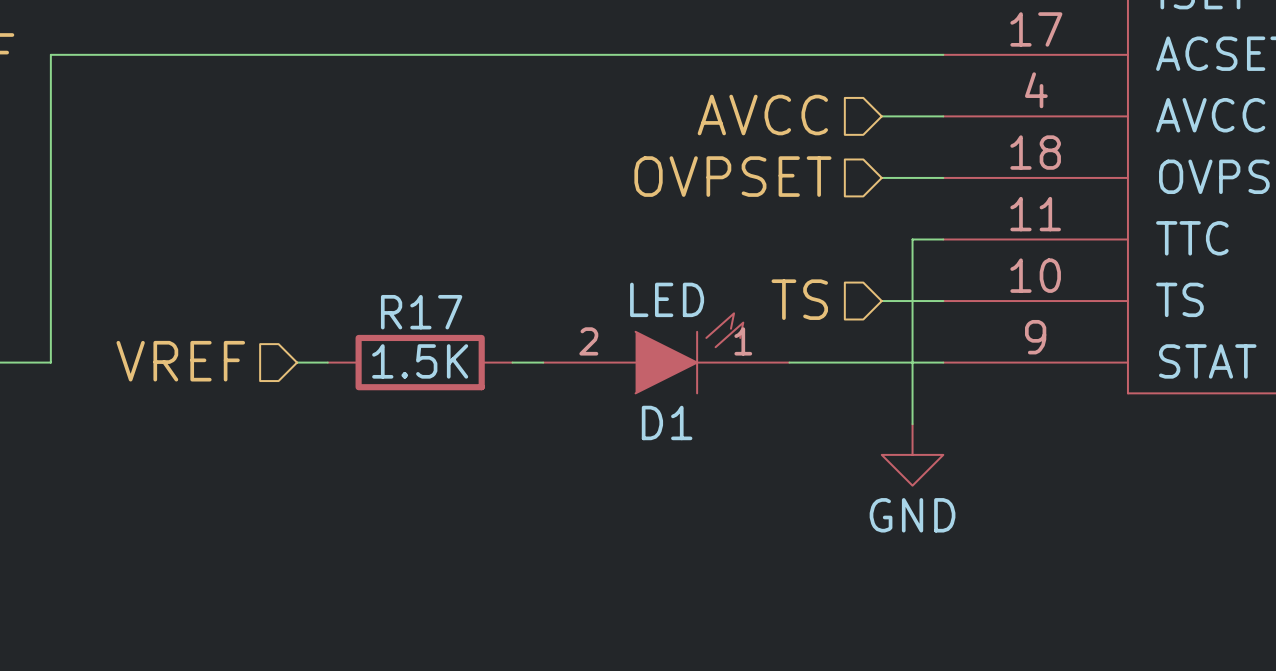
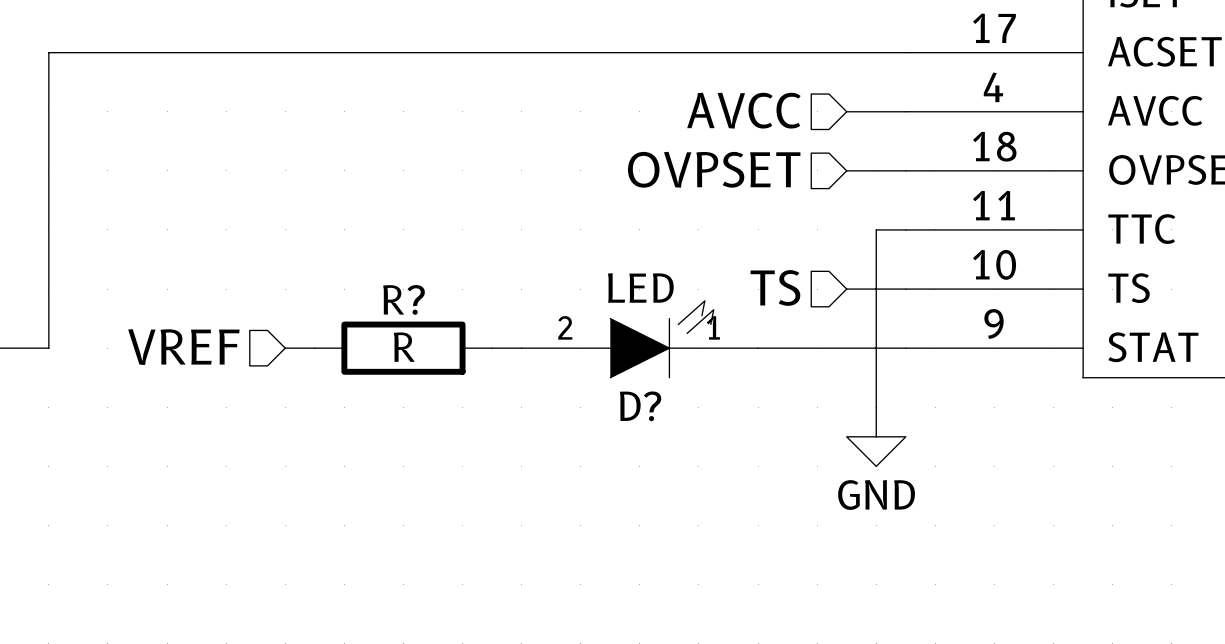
R17 name: R17 (421, 312) -> R? (403, 299)
R17 value: 1.5K (420, 361) -> R (404, 347)
D1 name: D1 (667, 422) -> D? (640, 406)

